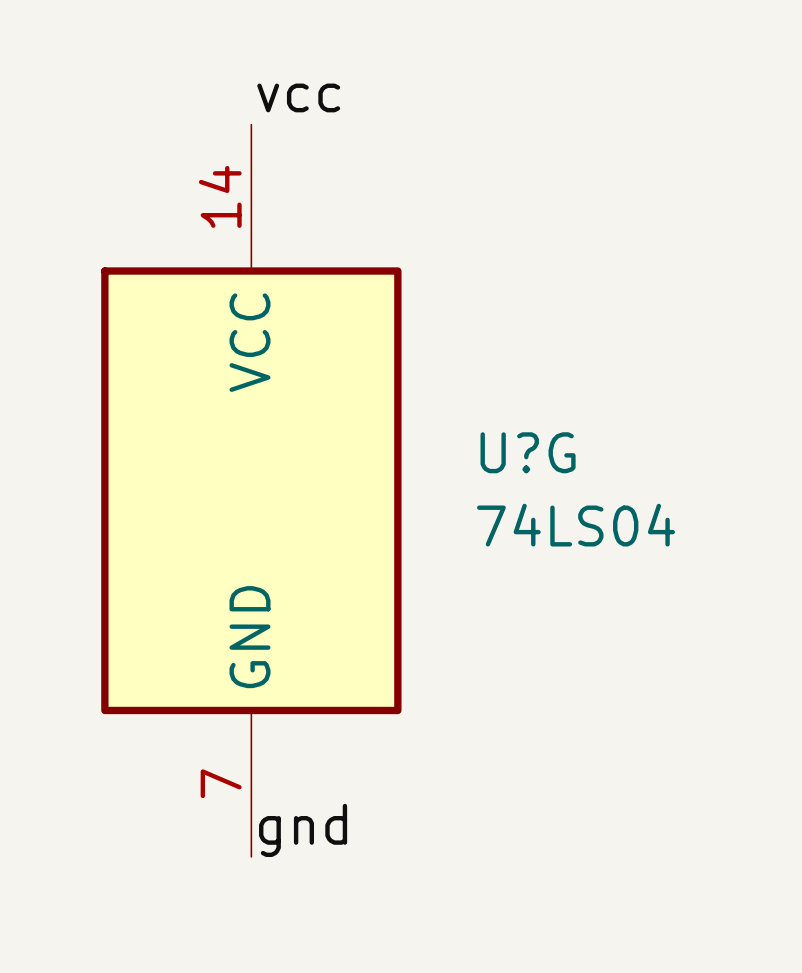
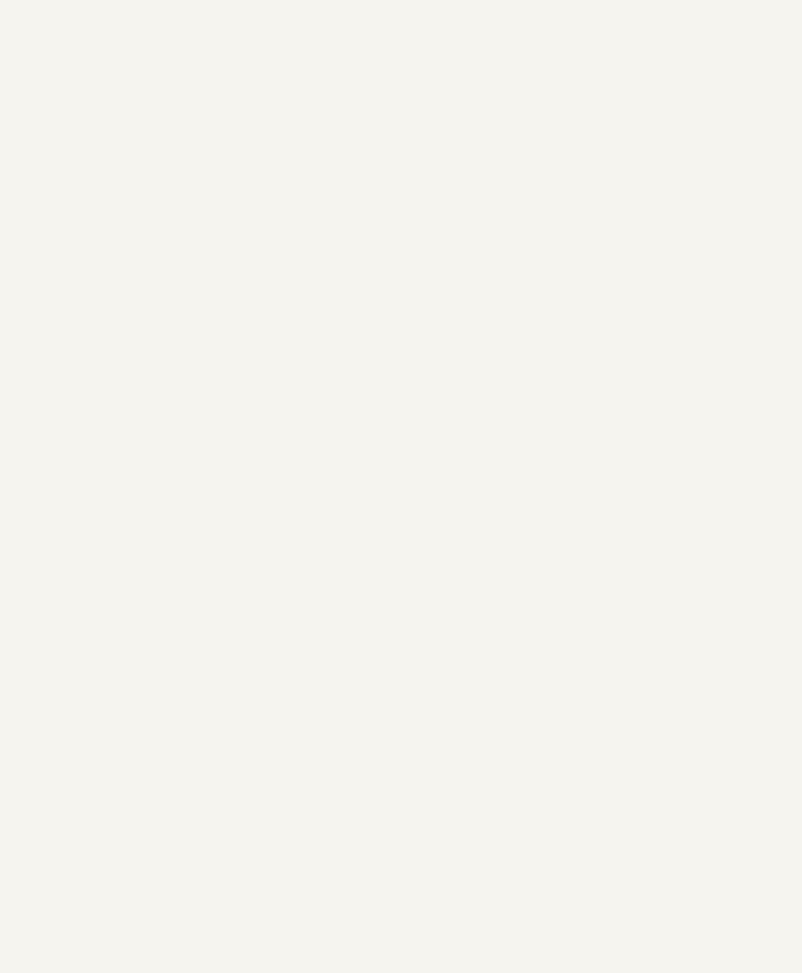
label: vcc (298, 97) -> none
U?G: 74LS04 (251, 490) -> none
label: gnd (303, 830) -> none

